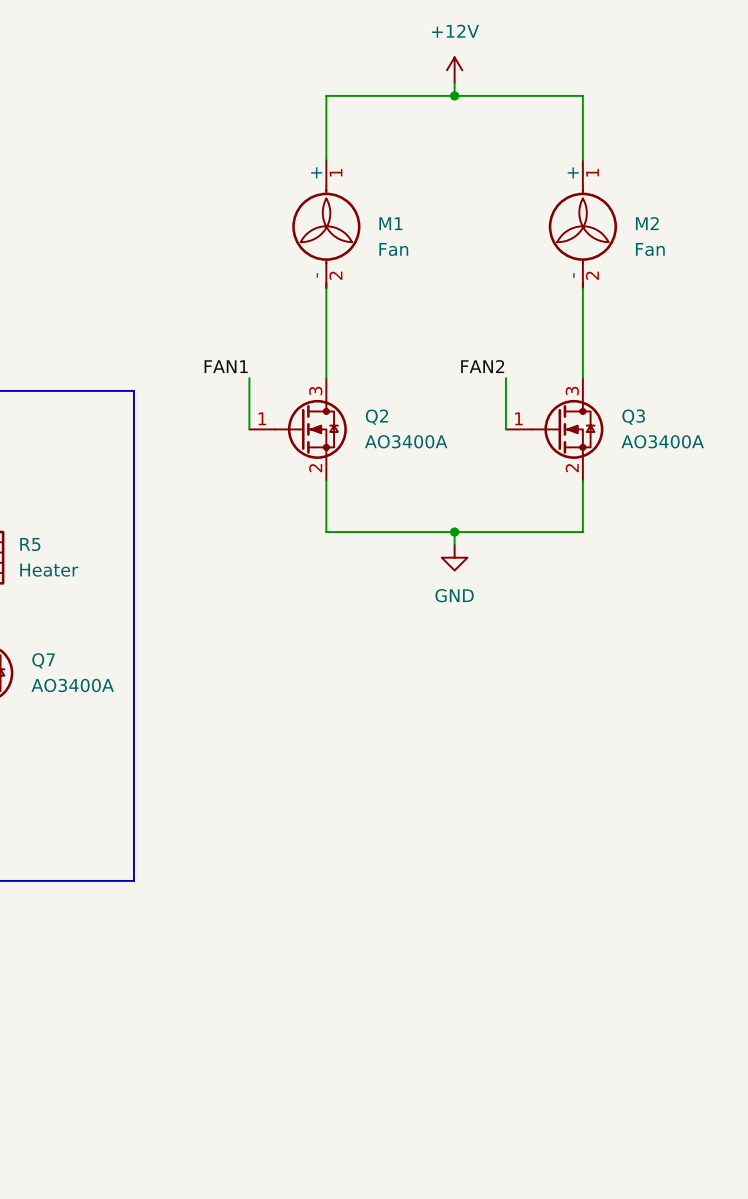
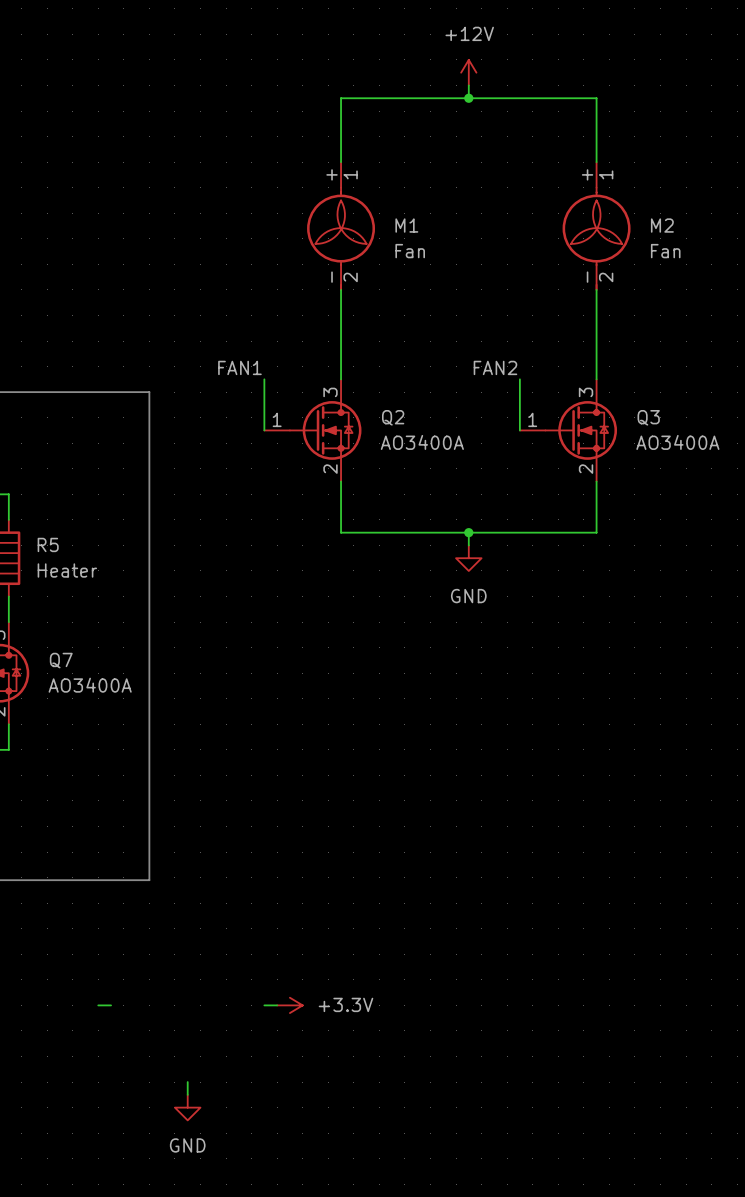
wire: none -> (98, 1005) (111, 1005)
wire: none -> (264, 1005) (277, 1005)
power symbol: none -> +3.3V (289, 1005)
wire: none -> (187, 1082) (187, 1094)
power symbol: none -> GND (187, 1107)

